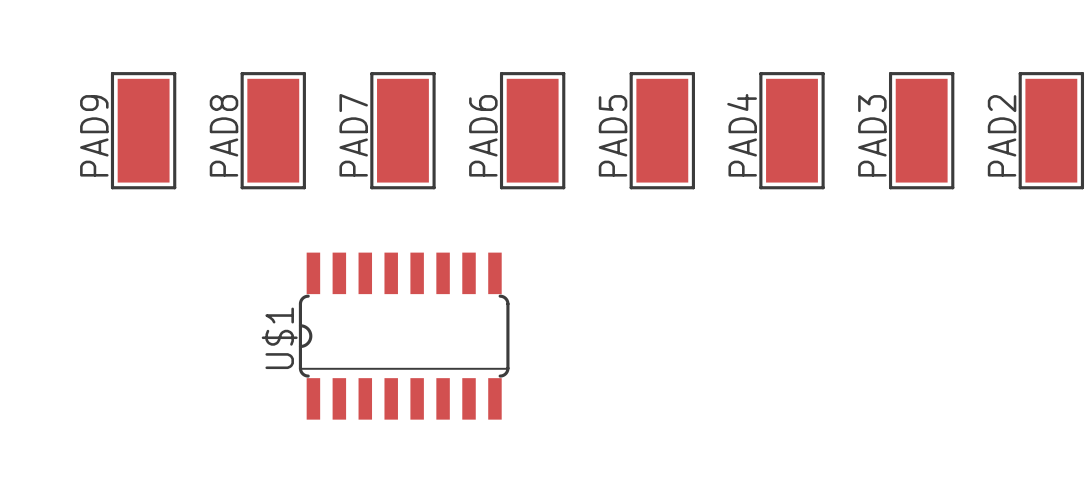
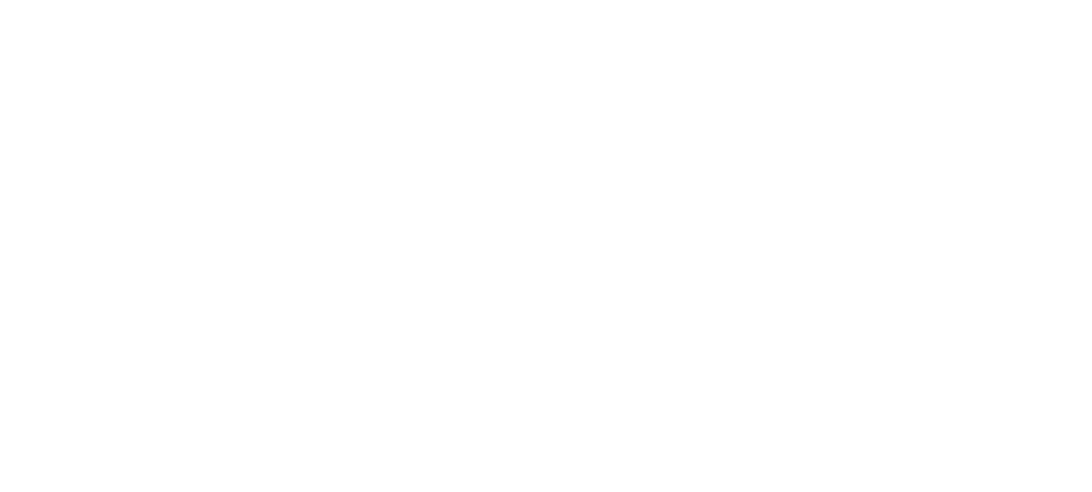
PAD9: (143, 130) -> none
PAD8: (273, 130) -> none
PAD7: (402, 130) -> none
PAD6: (532, 130) -> none
PAD5: (662, 130) -> none
PAD4: (791, 130) -> none
PAD3: (921, 130) -> none
PAD2: (1051, 130) -> none
U$1: (404, 336) -> none

